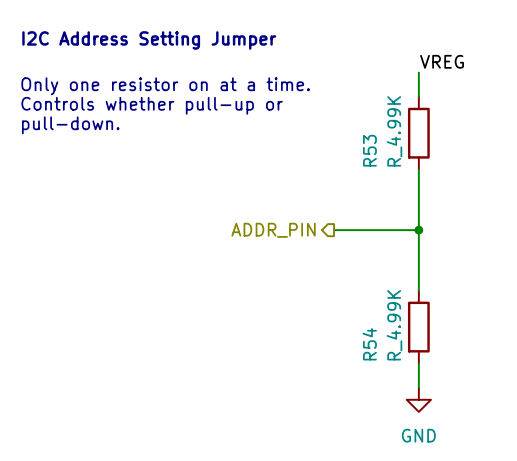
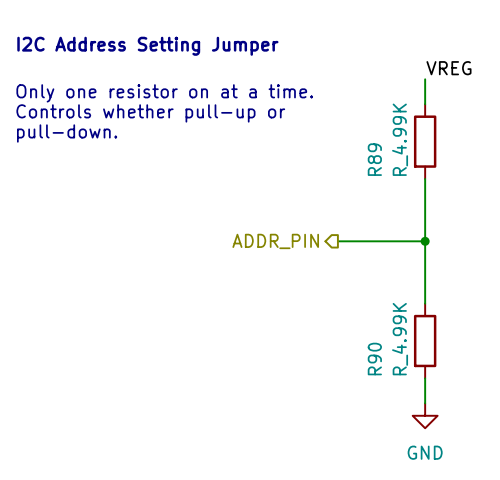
R53 name: R53 (369, 150) -> R89 (374, 159)
R54 name: R54 (369, 344) -> R90 (374, 359)

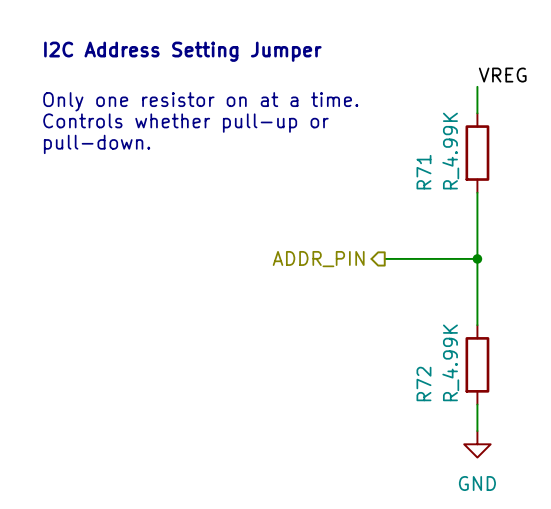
R89 name: R89 (374, 159) -> R71 (423, 172)
R90 name: R90 (374, 359) -> R72 (423, 383)

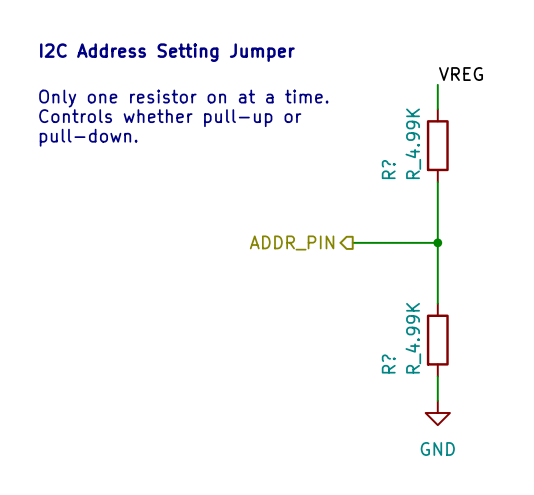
R71 name: R71 (423, 172) -> R? (388, 169)
R72 name: R72 (423, 383) -> R? (388, 364)

